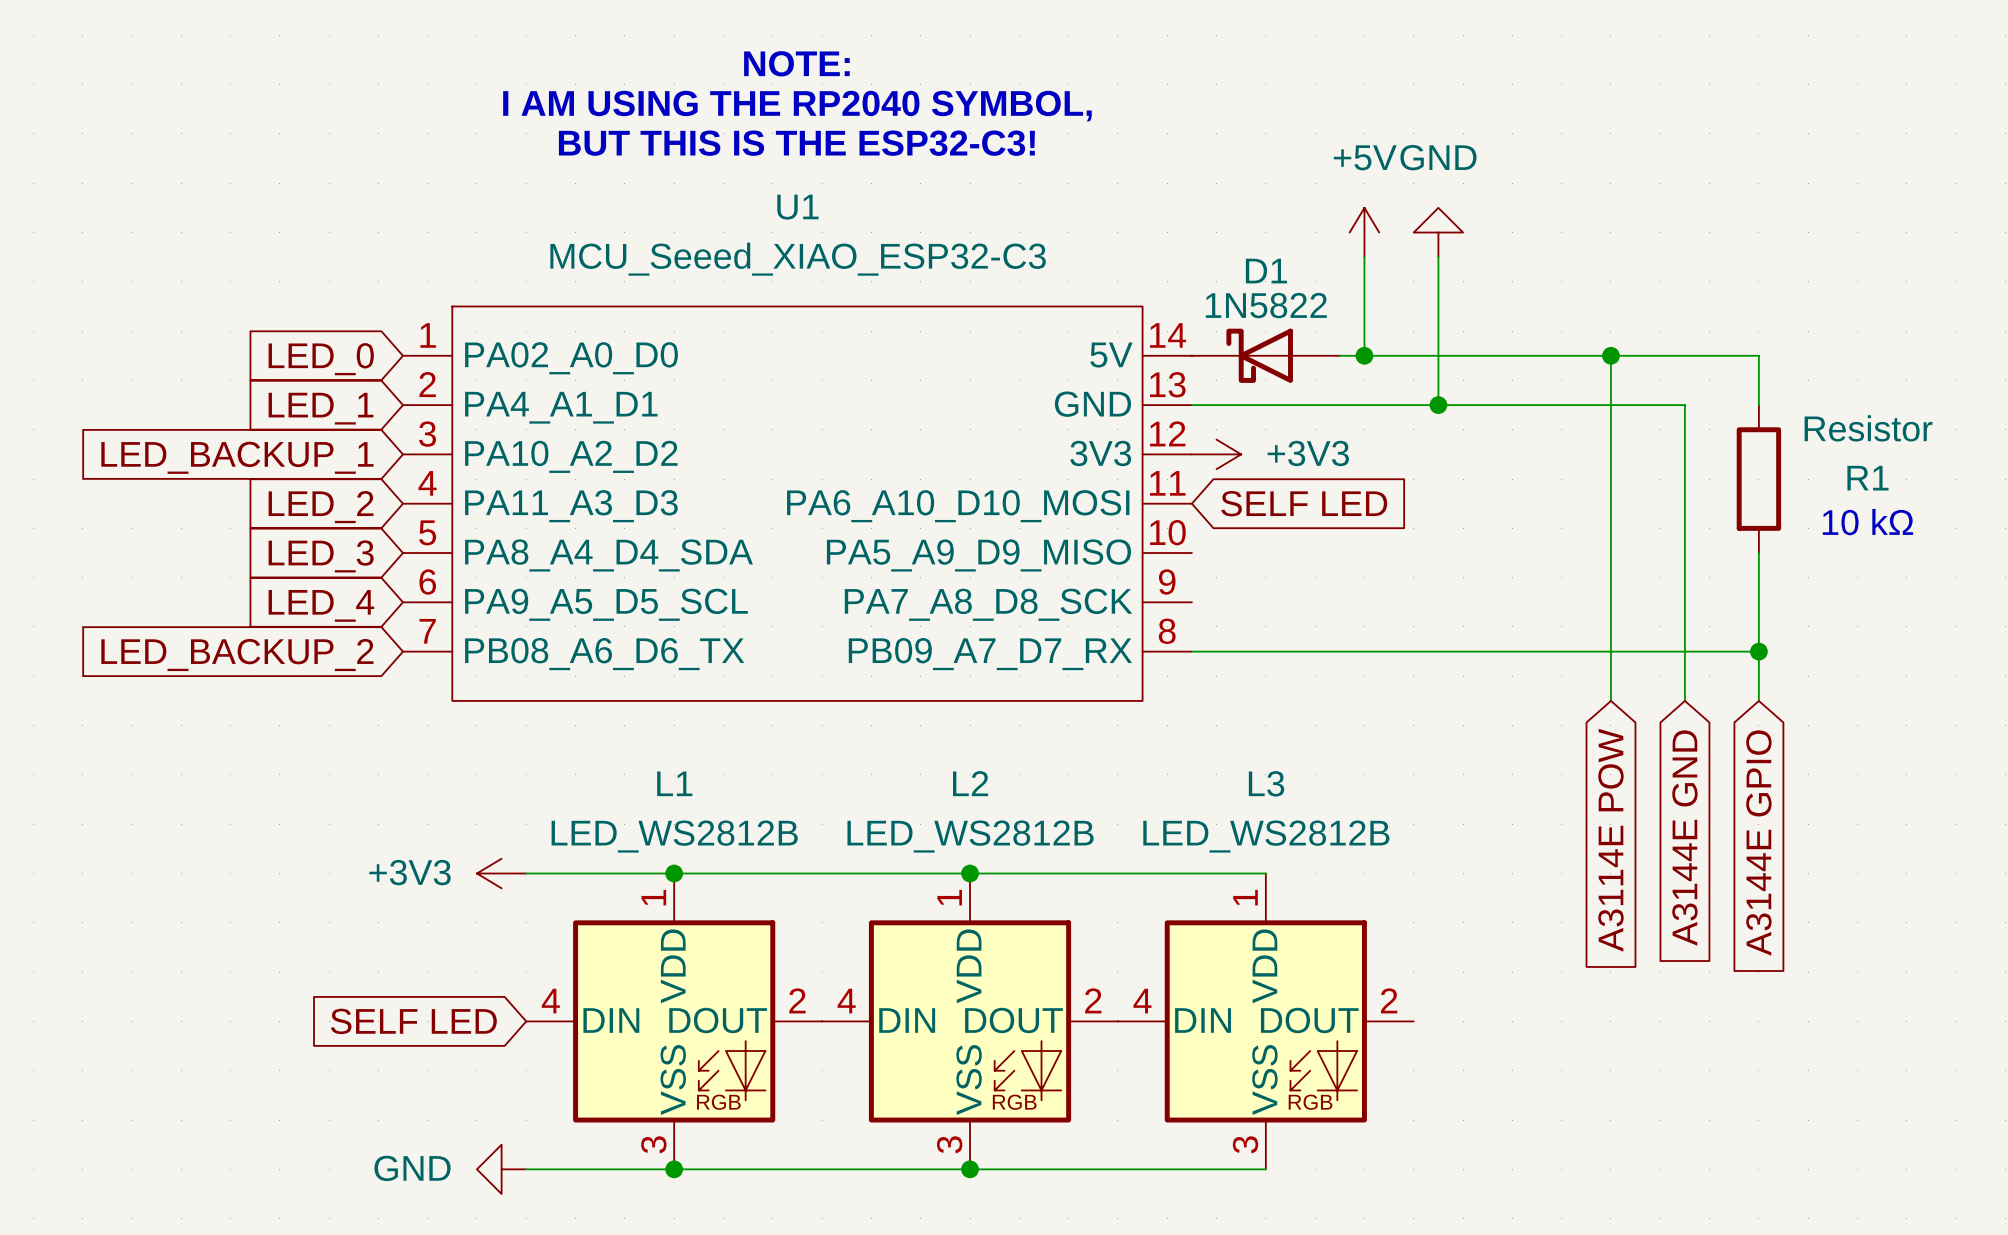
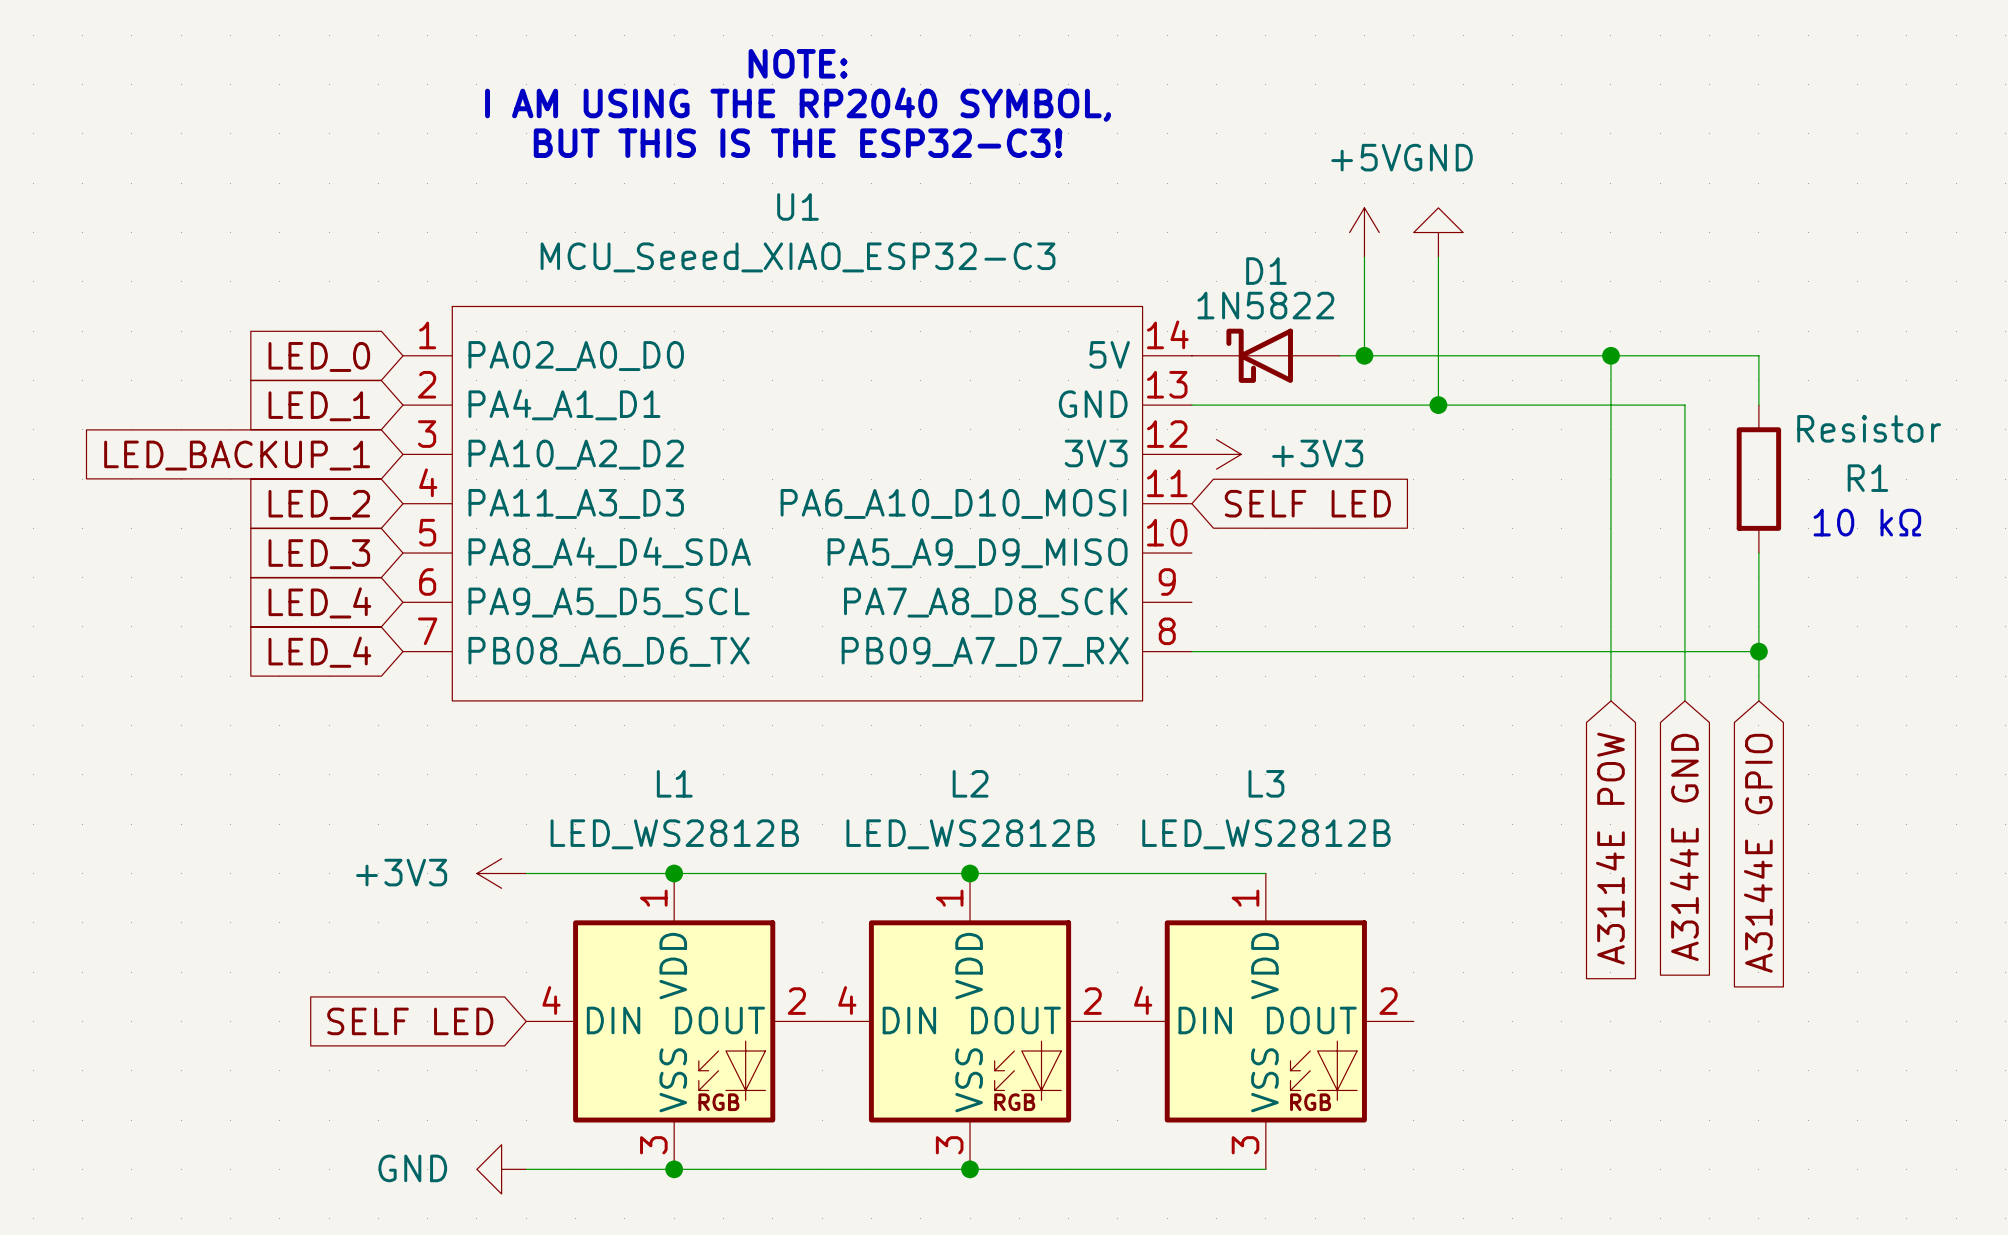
global label: LED_BACKUP_2 (237, 655) -> LED_4 (319, 652)

